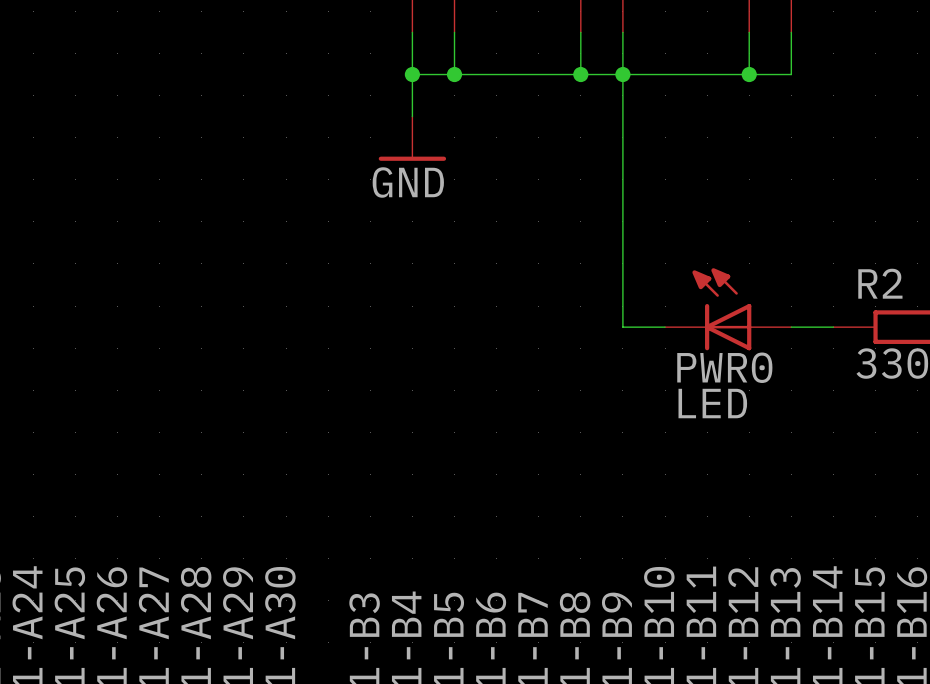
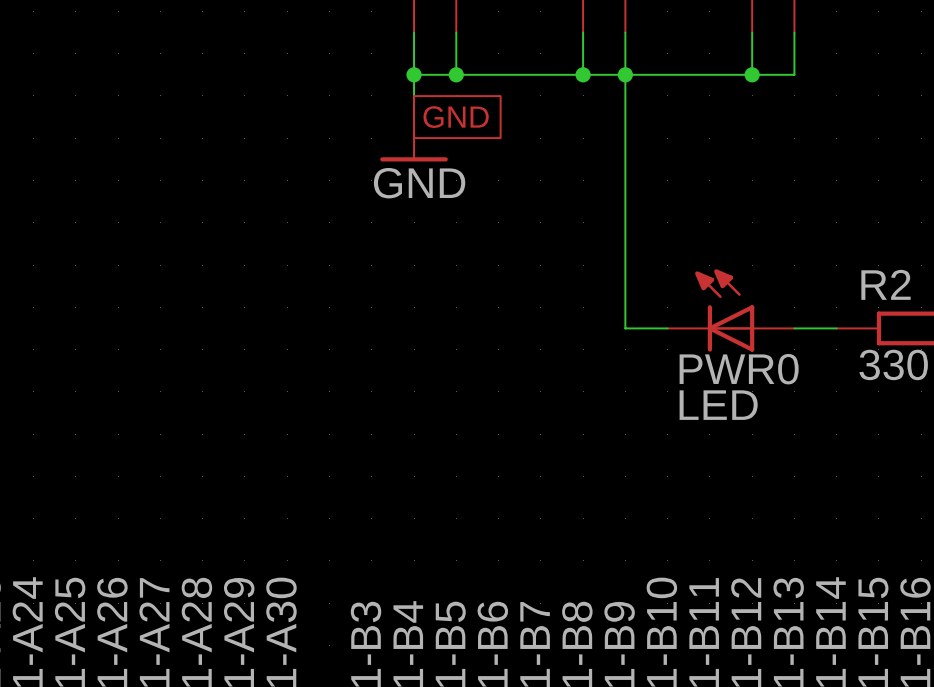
global label: none -> GND (456, 117)

